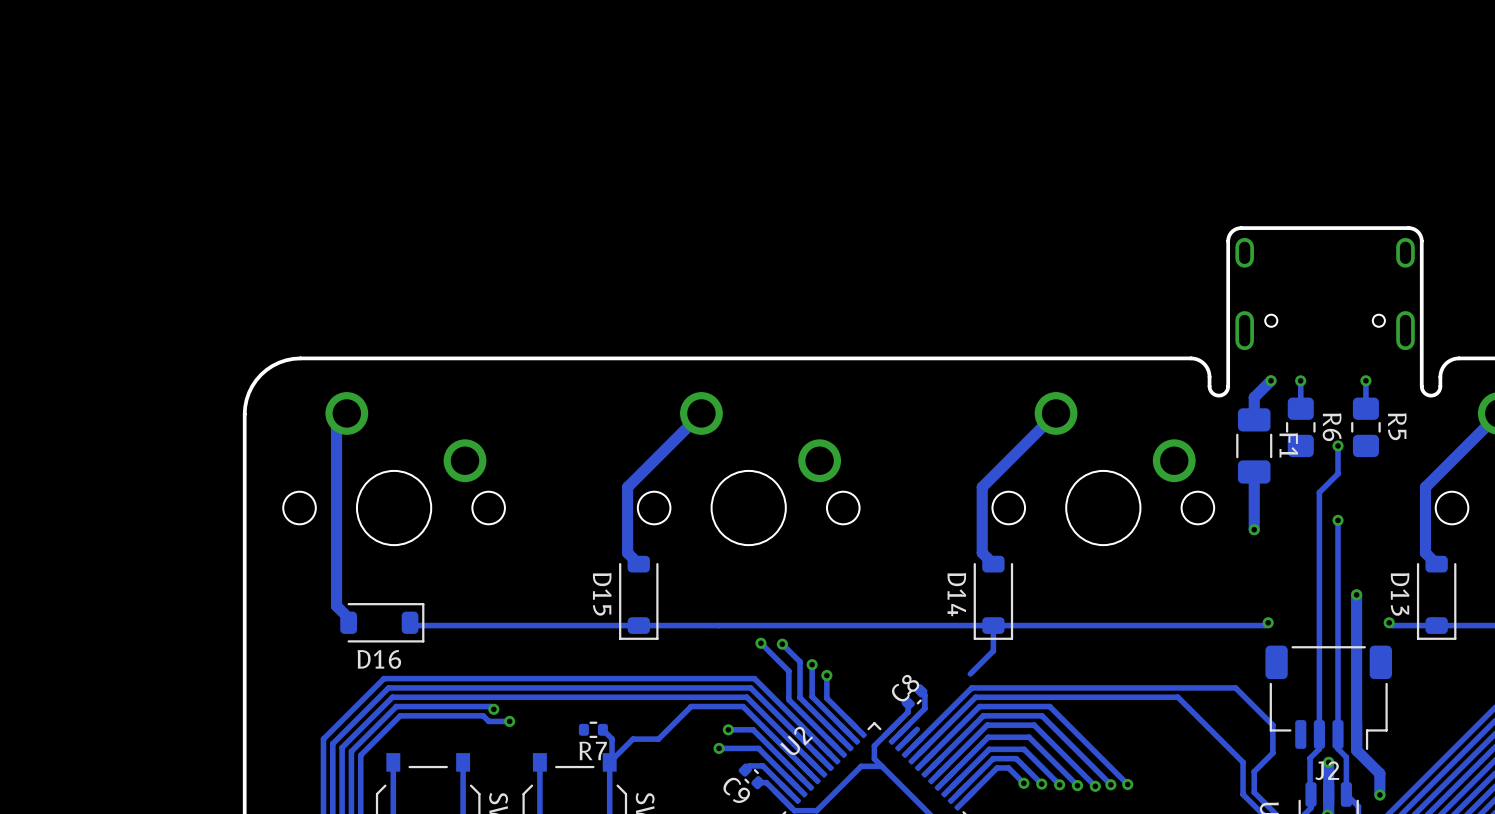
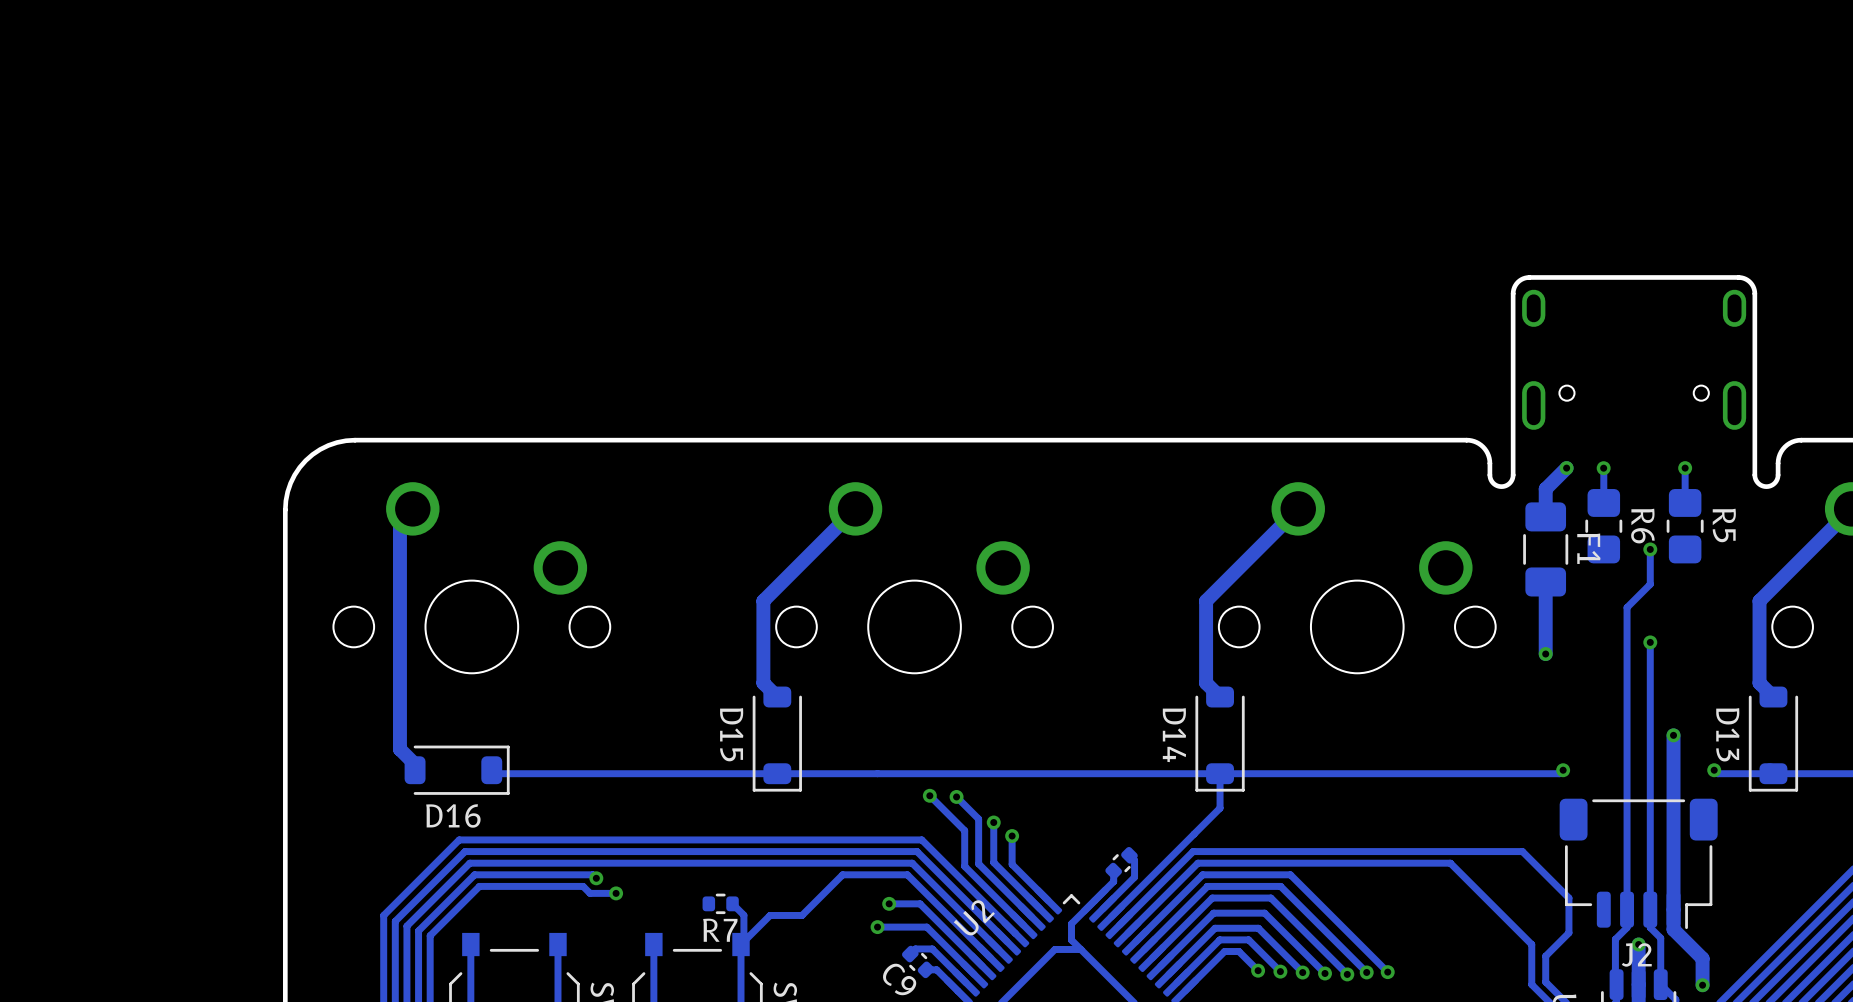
track: (993, 650) (970, 673) -> (1220, 805) (1220, 808) (1124, 903)
C8 name: C8 (905, 688) -> none

